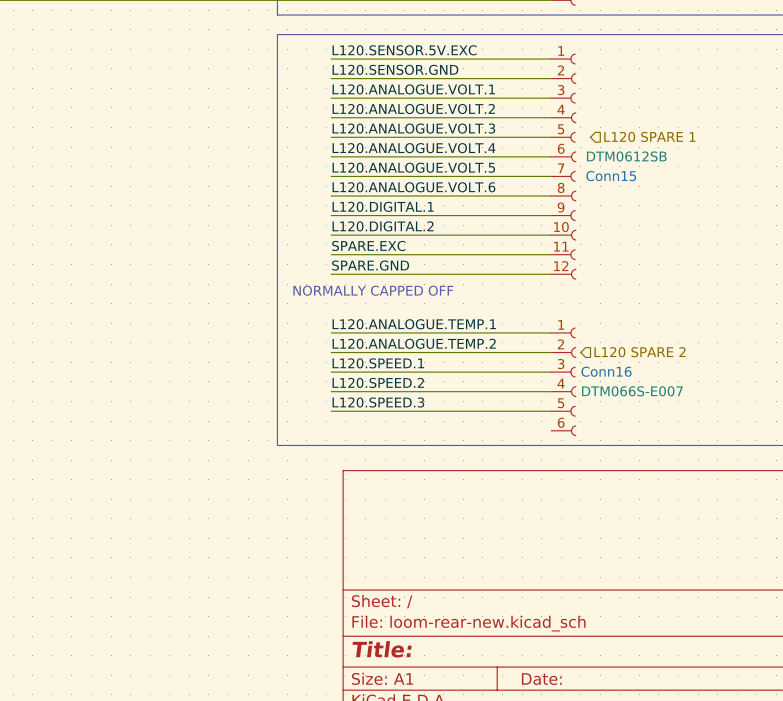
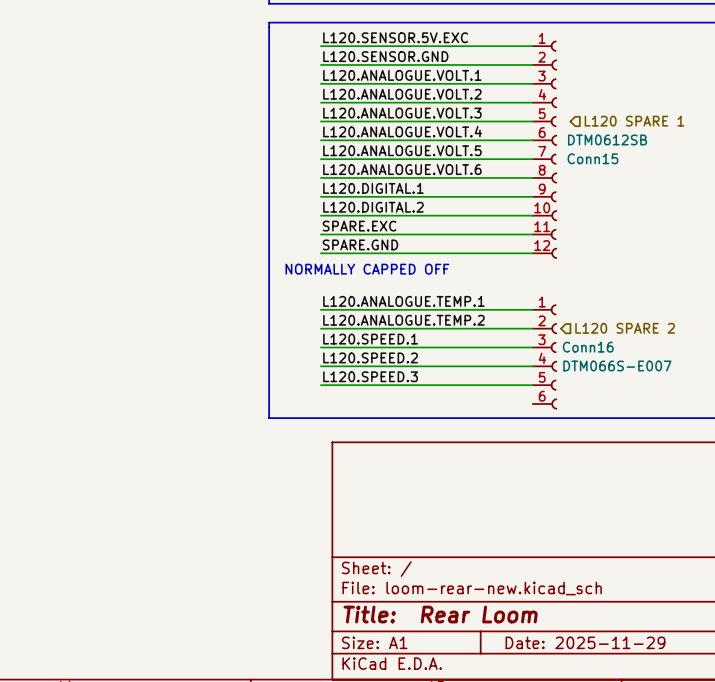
title block: Title: (382, 649) -> Title: Rear Loom (440, 614)
title block: Date: (541, 679) -> Date: 2025-11-29 (585, 642)

